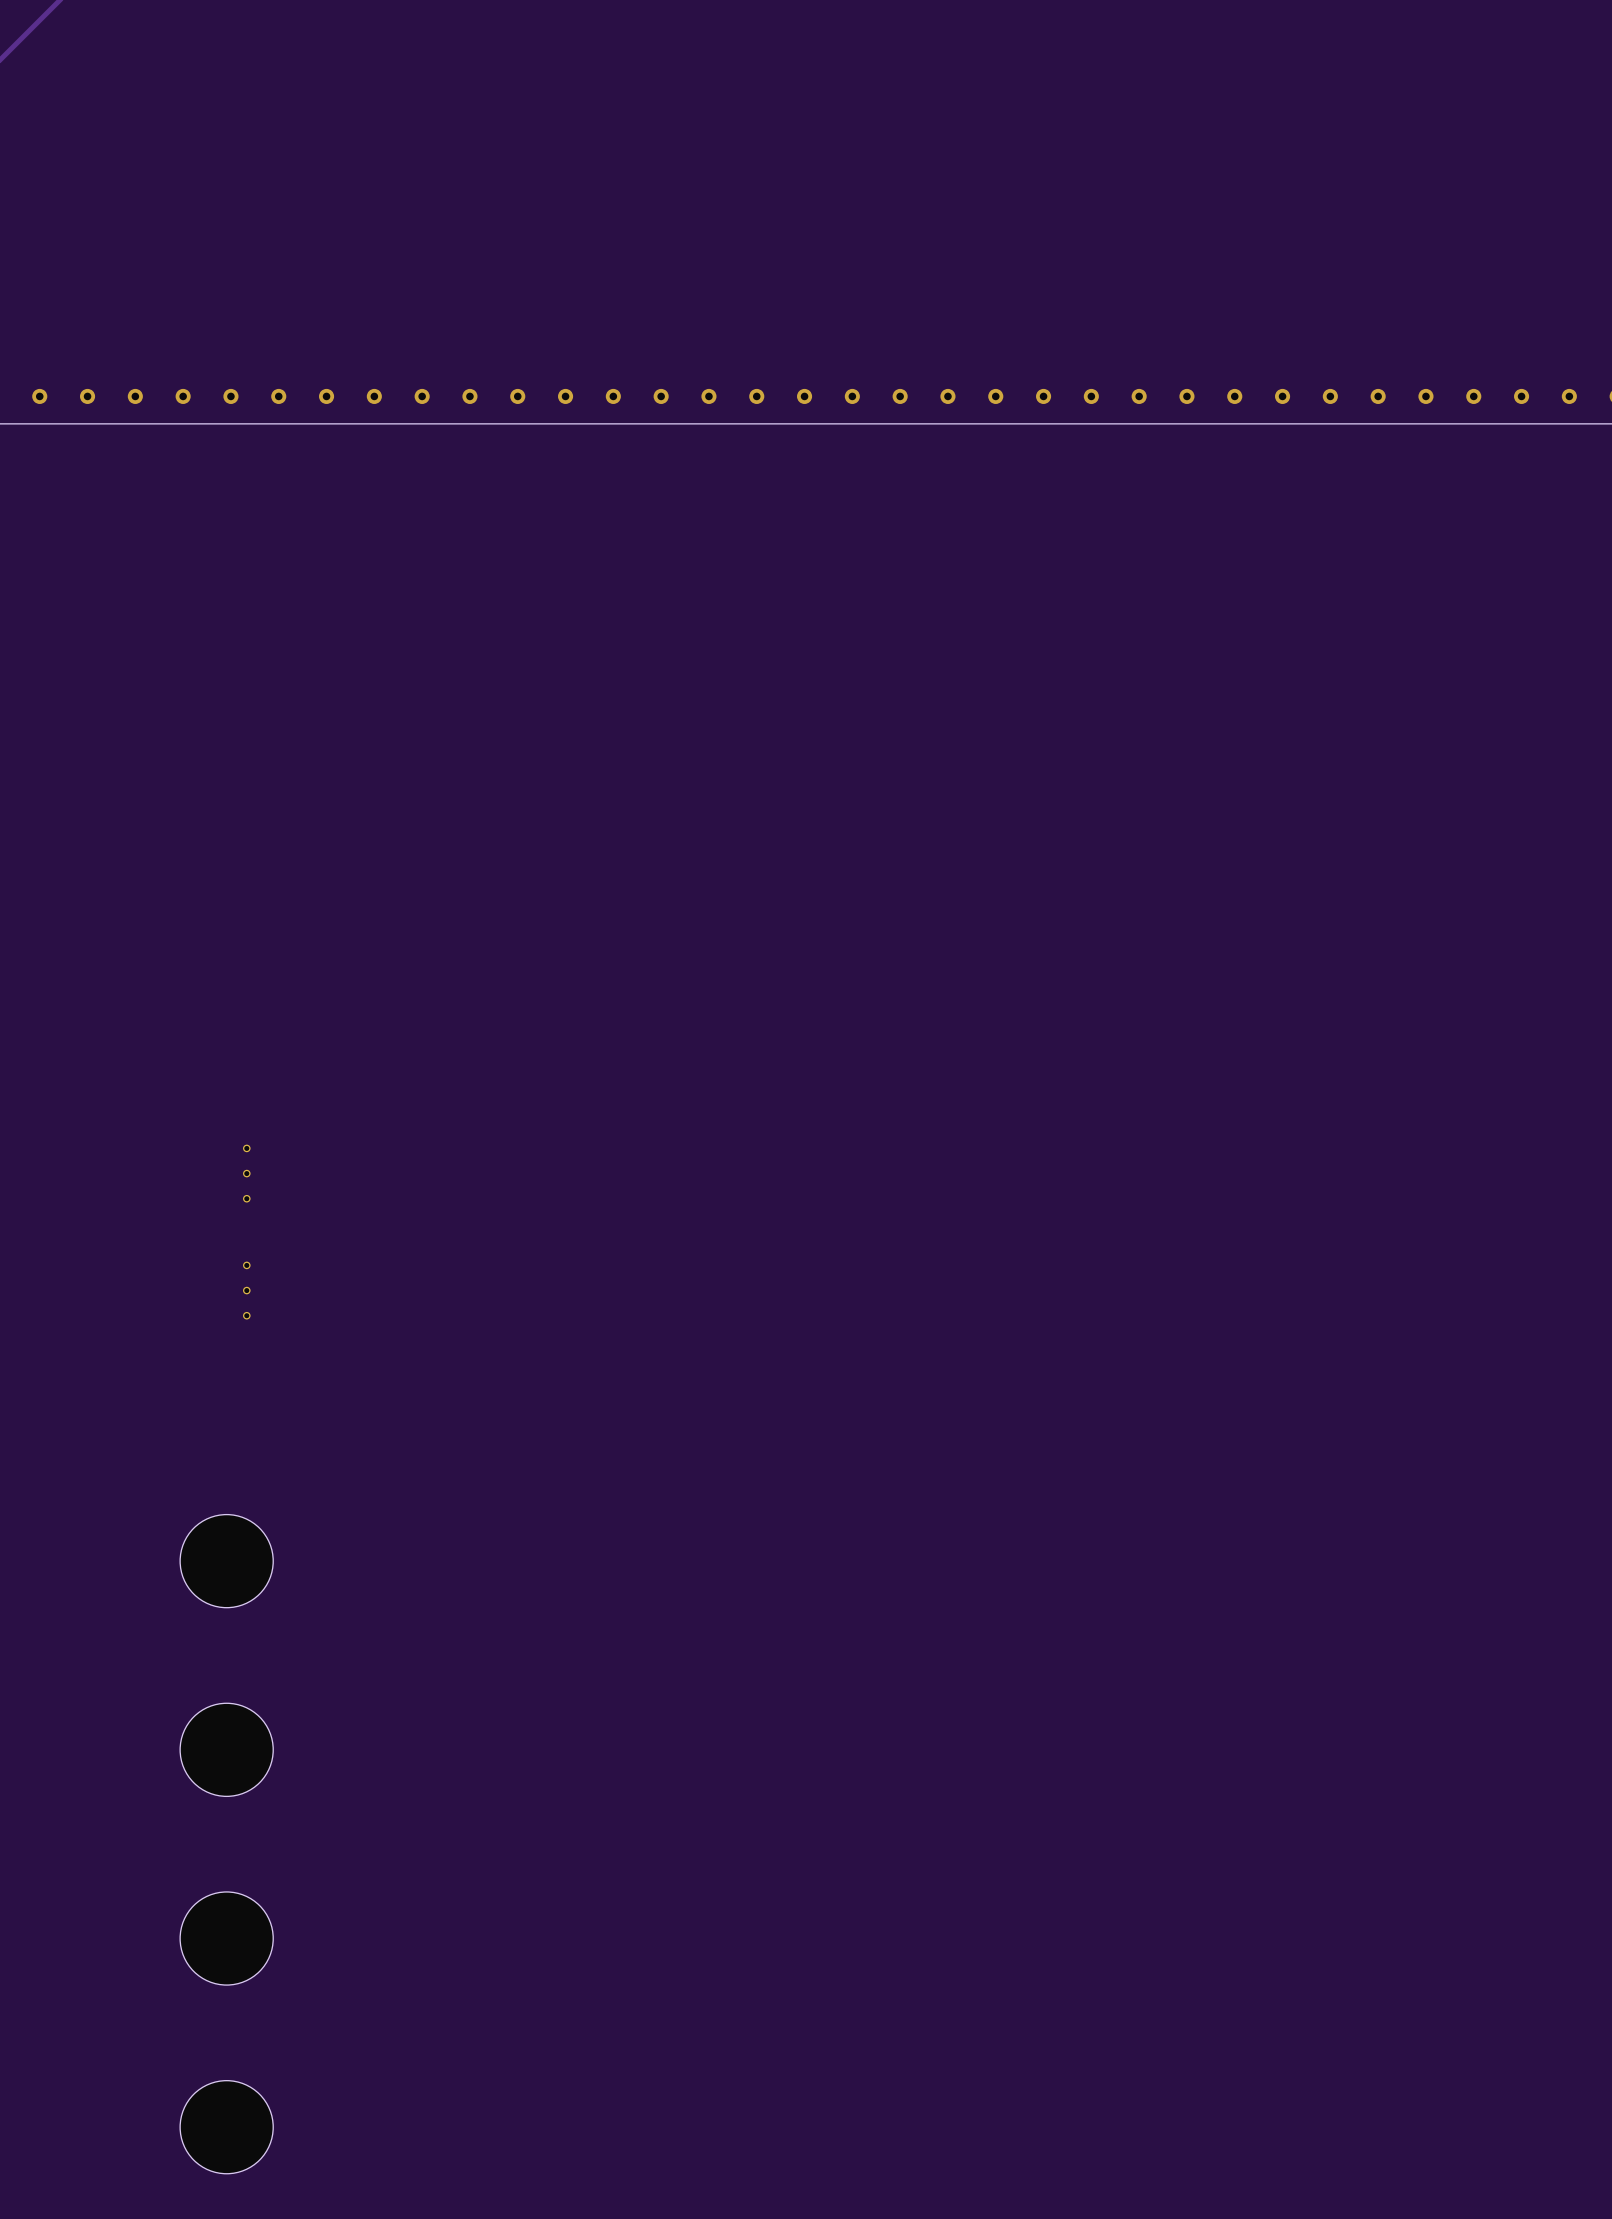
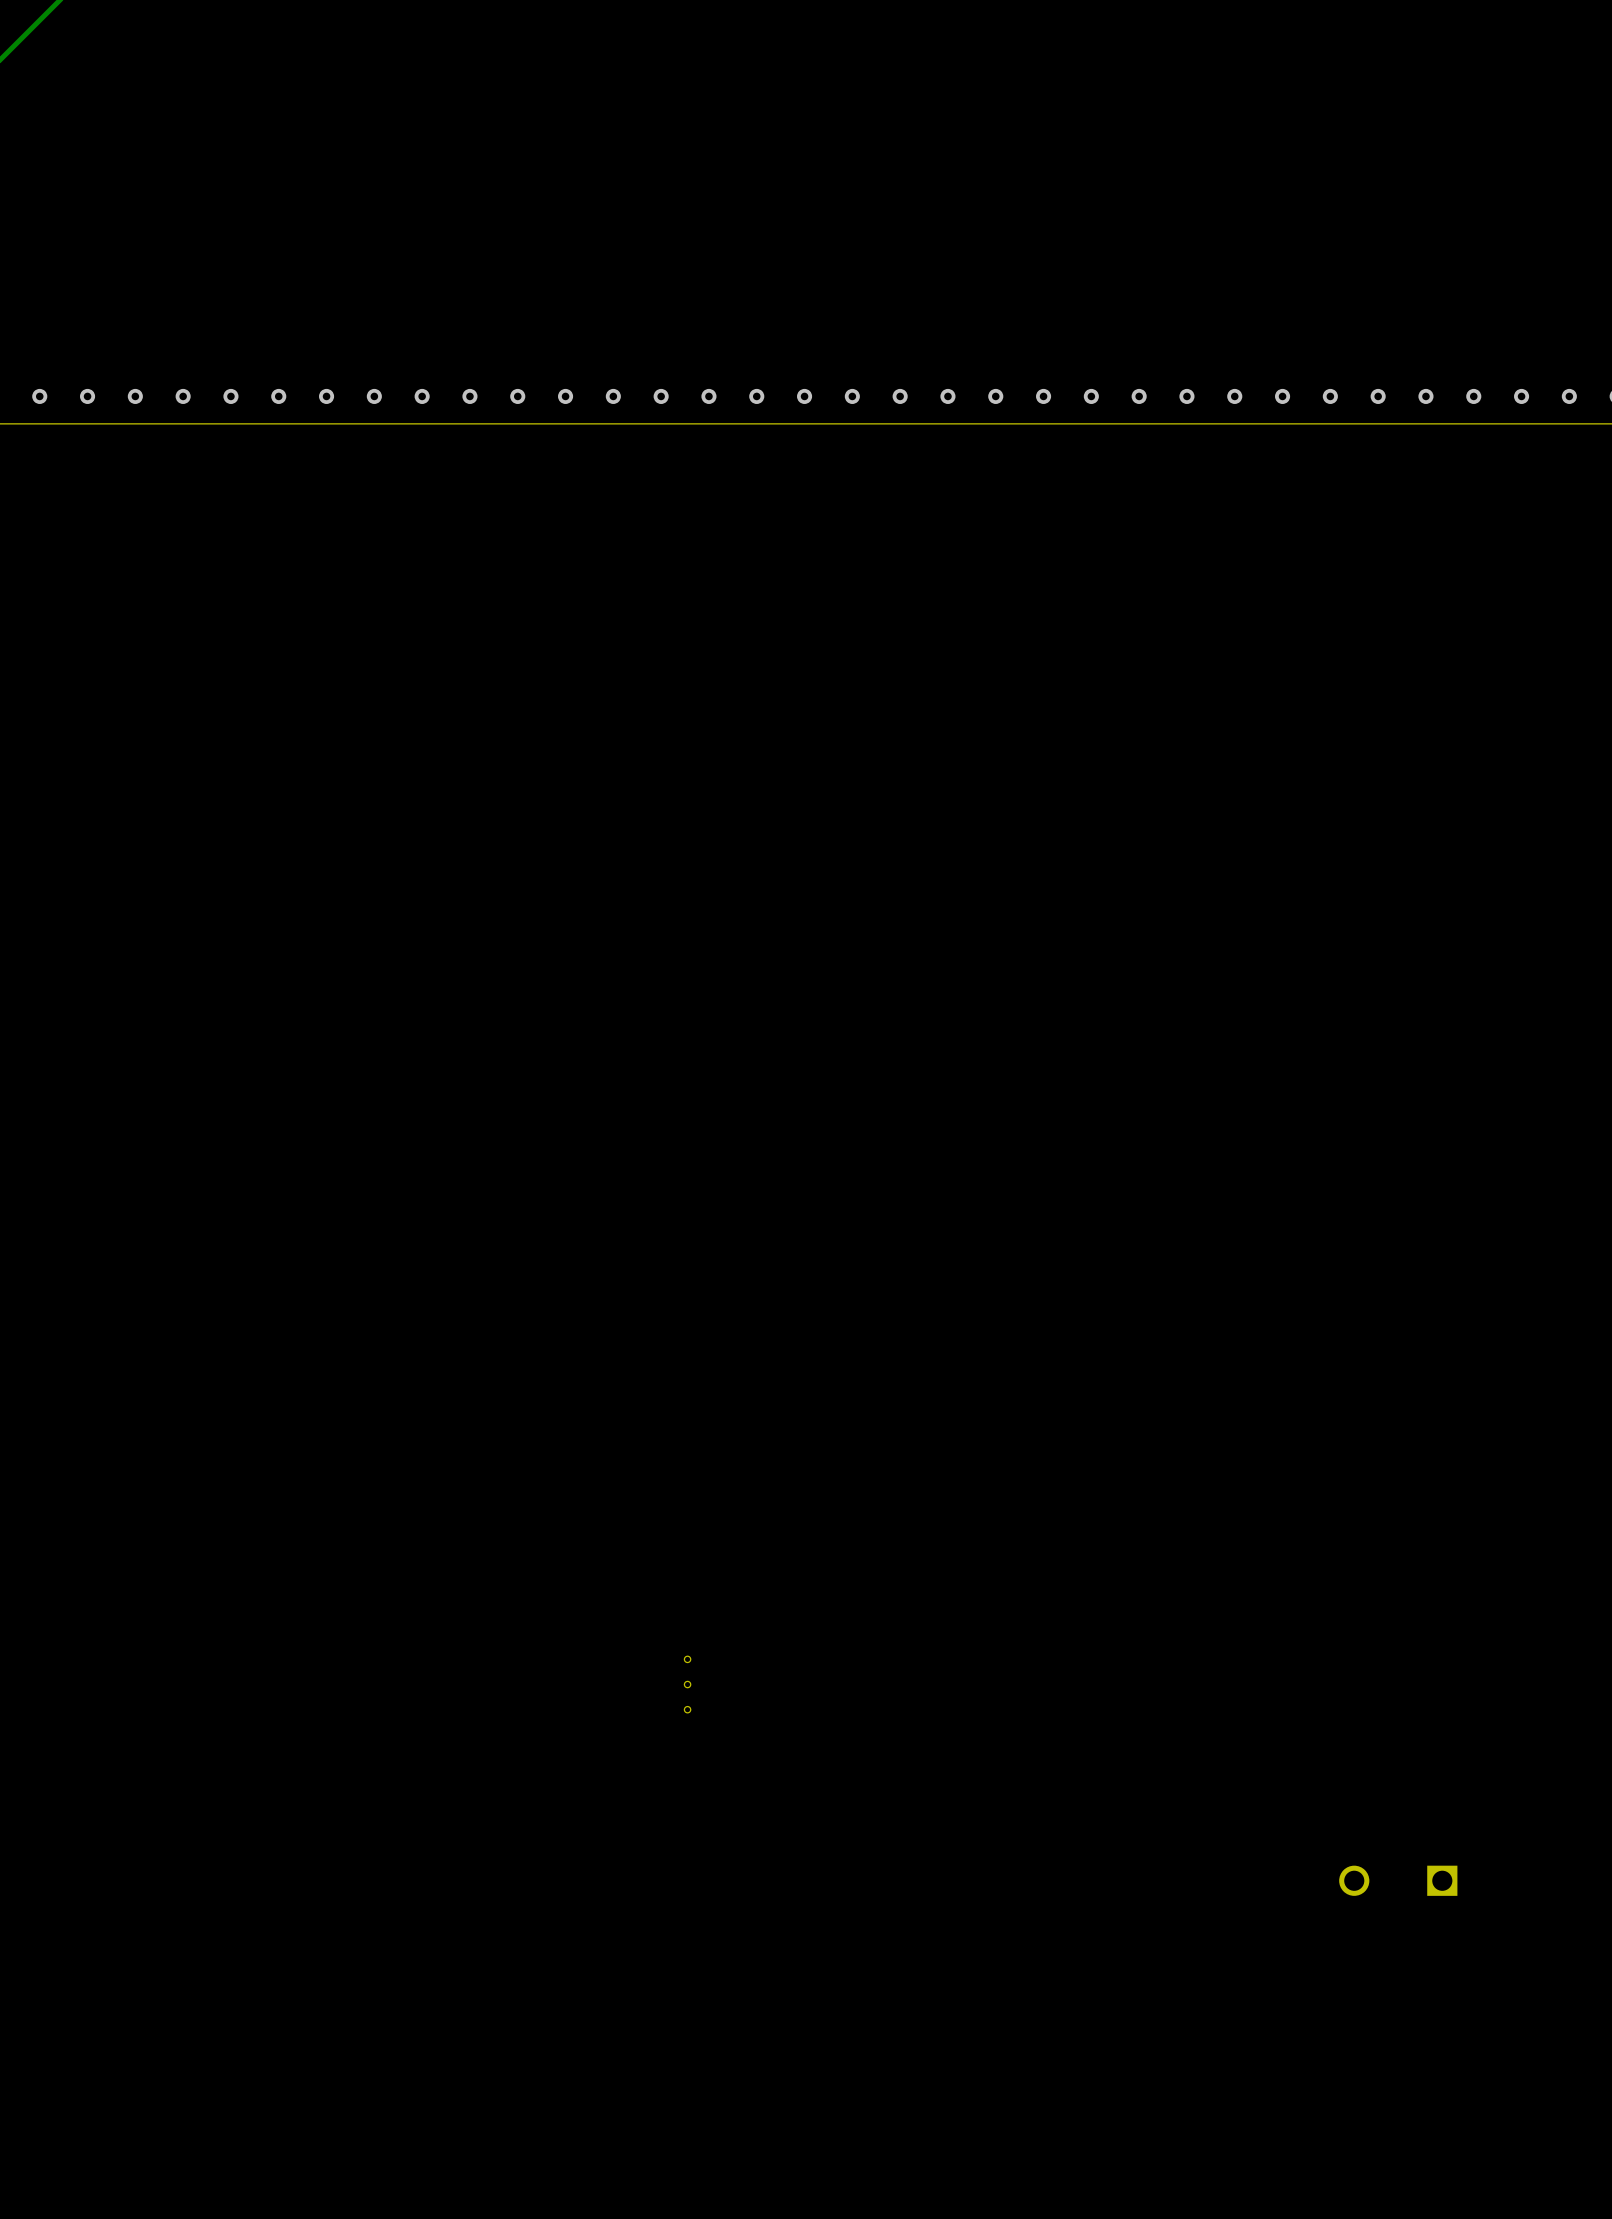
part: (246, 1173) -> none
part: (246, 1290) -> none
part: (226, 1561) -> none
part: none -> (687, 1684)
part: (226, 1749) -> none
part: none -> (1398, 1880)
part: (226, 1938) -> none
part: (226, 2127) -> none

